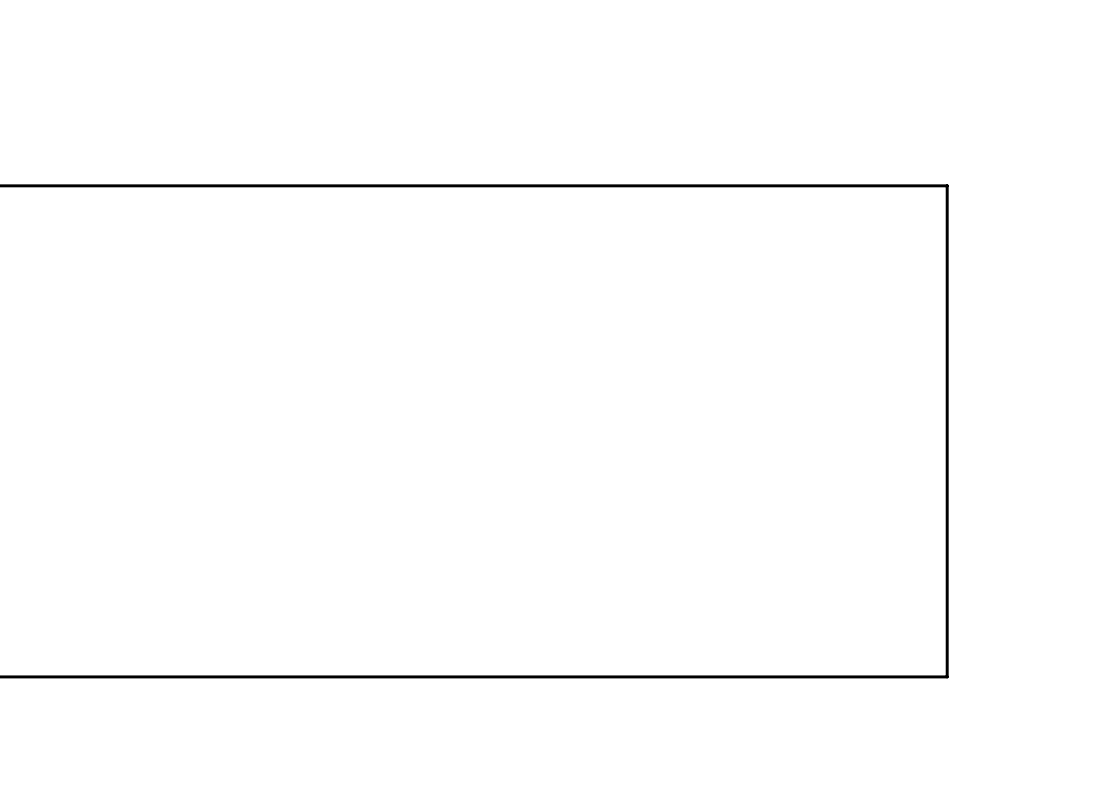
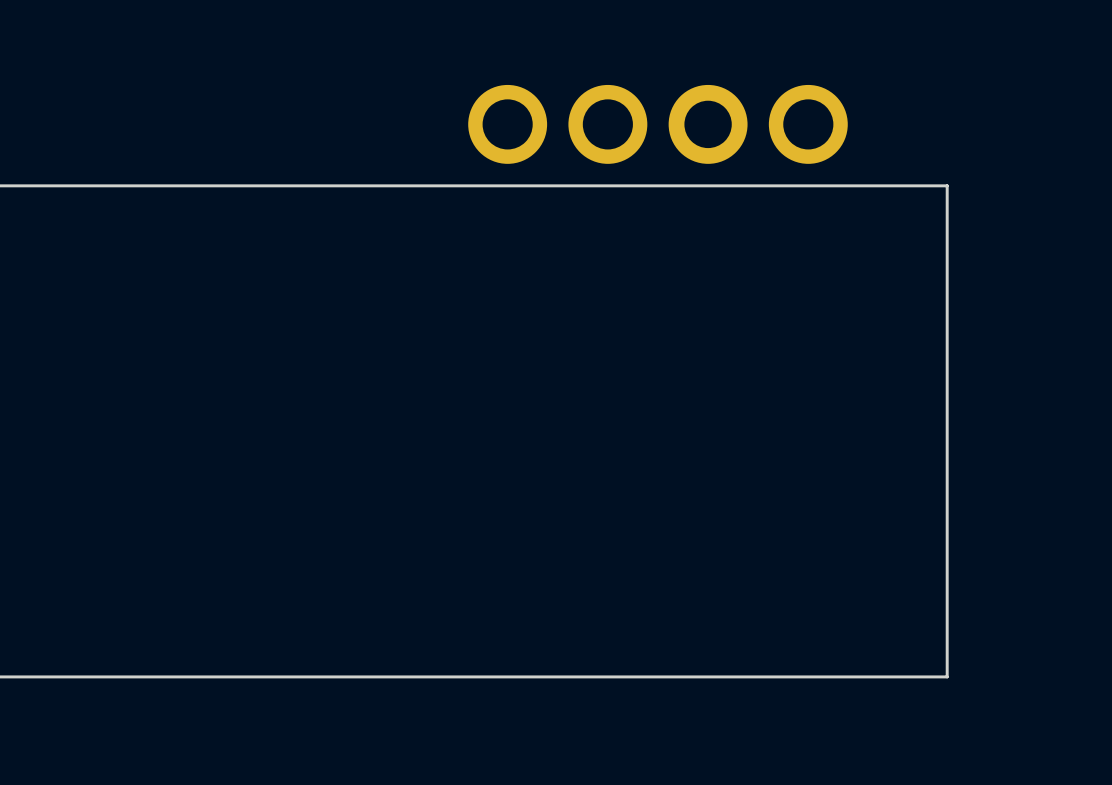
part: none -> (657, 124)

